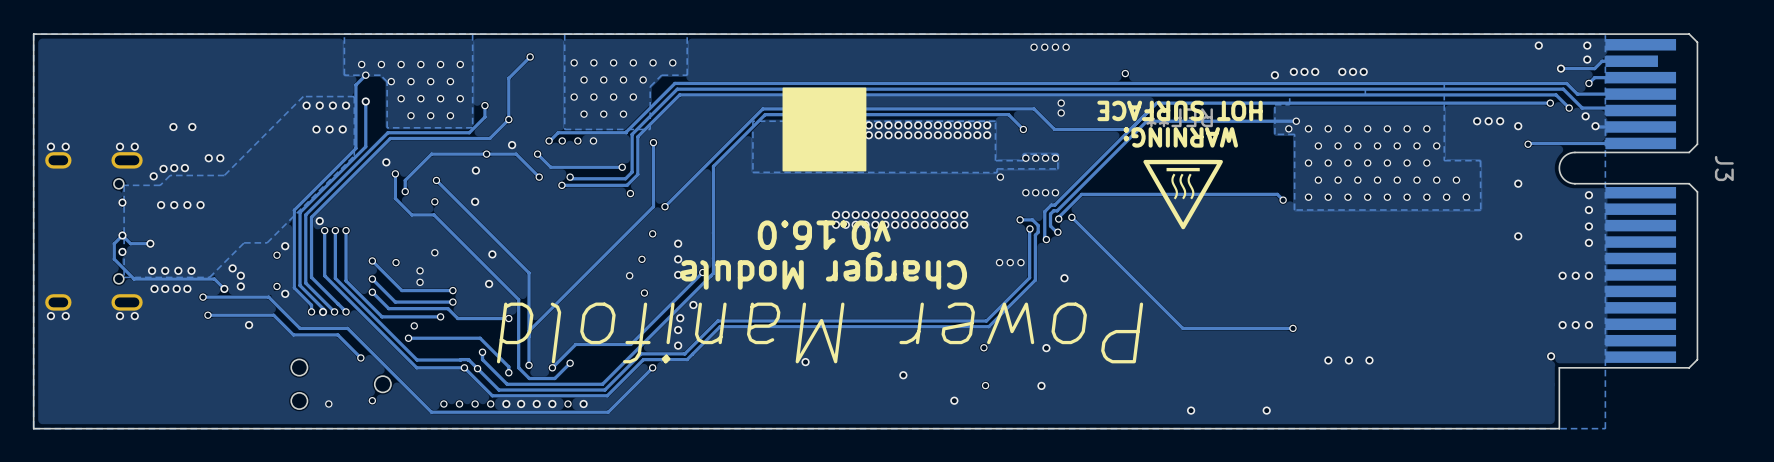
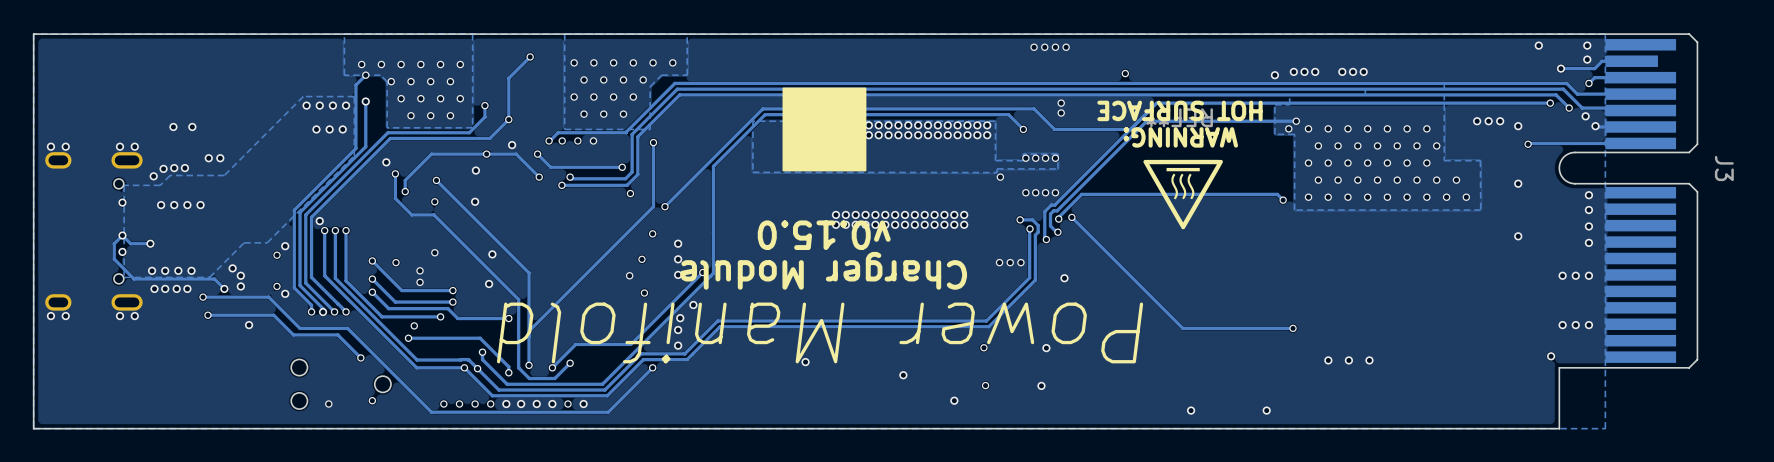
text: v0.16.0 (824, 235) -> v0.15.0 (824, 235)

